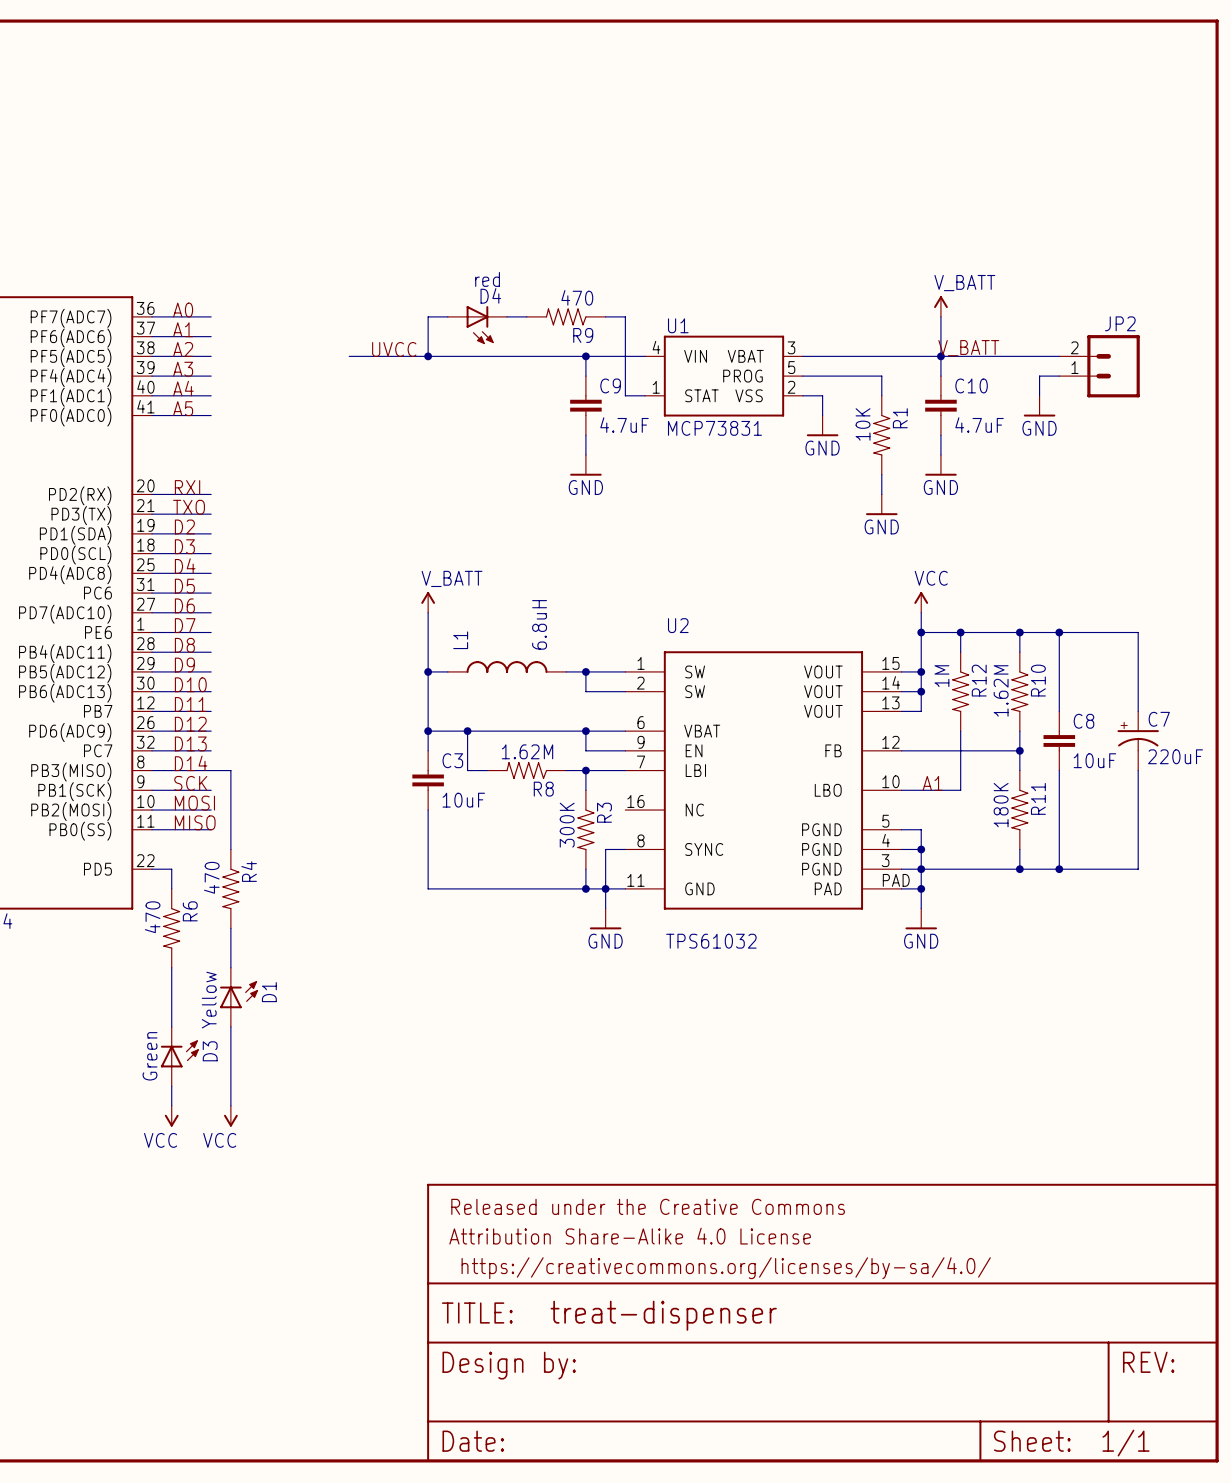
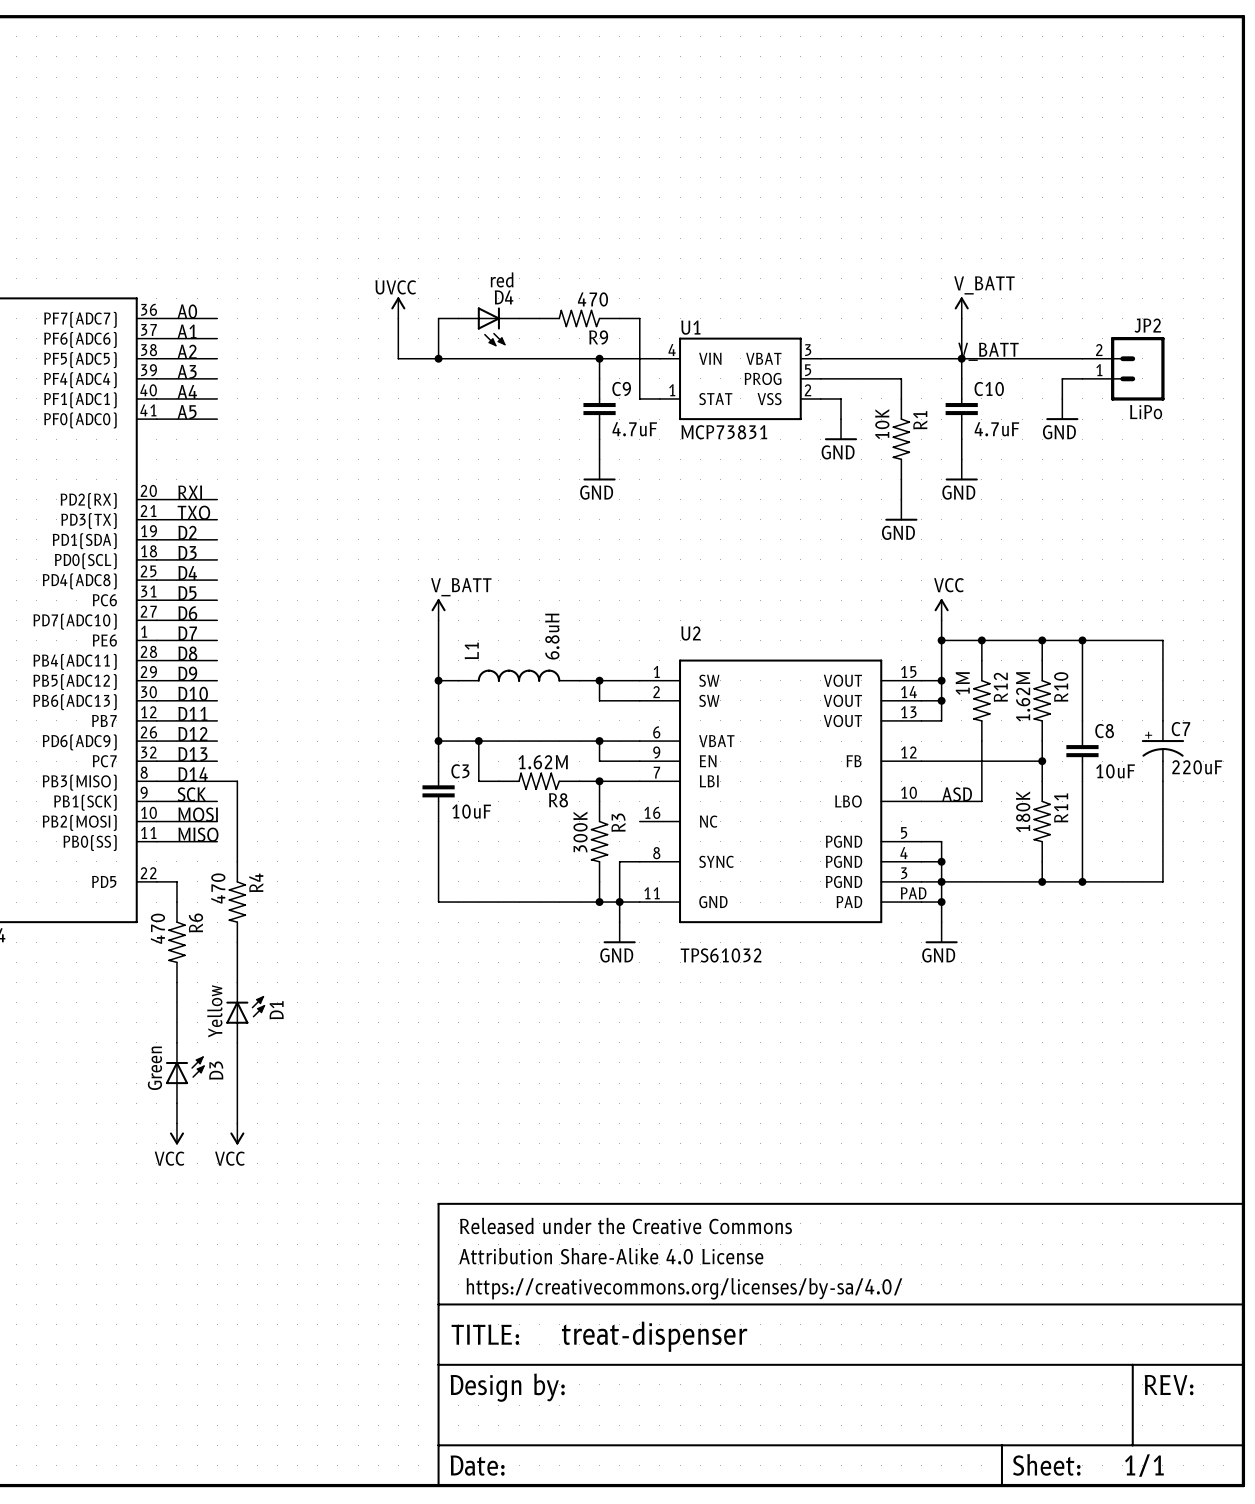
power symbol: none -> UVCC (398, 307)
label: UVCC (394, 349) -> none
wire: (349, 356) (388, 356) -> (398, 318) (398, 358)
JP2 value: none -> LiPo (1146, 412)
label: A1 (932, 783) -> ASD (957, 794)

